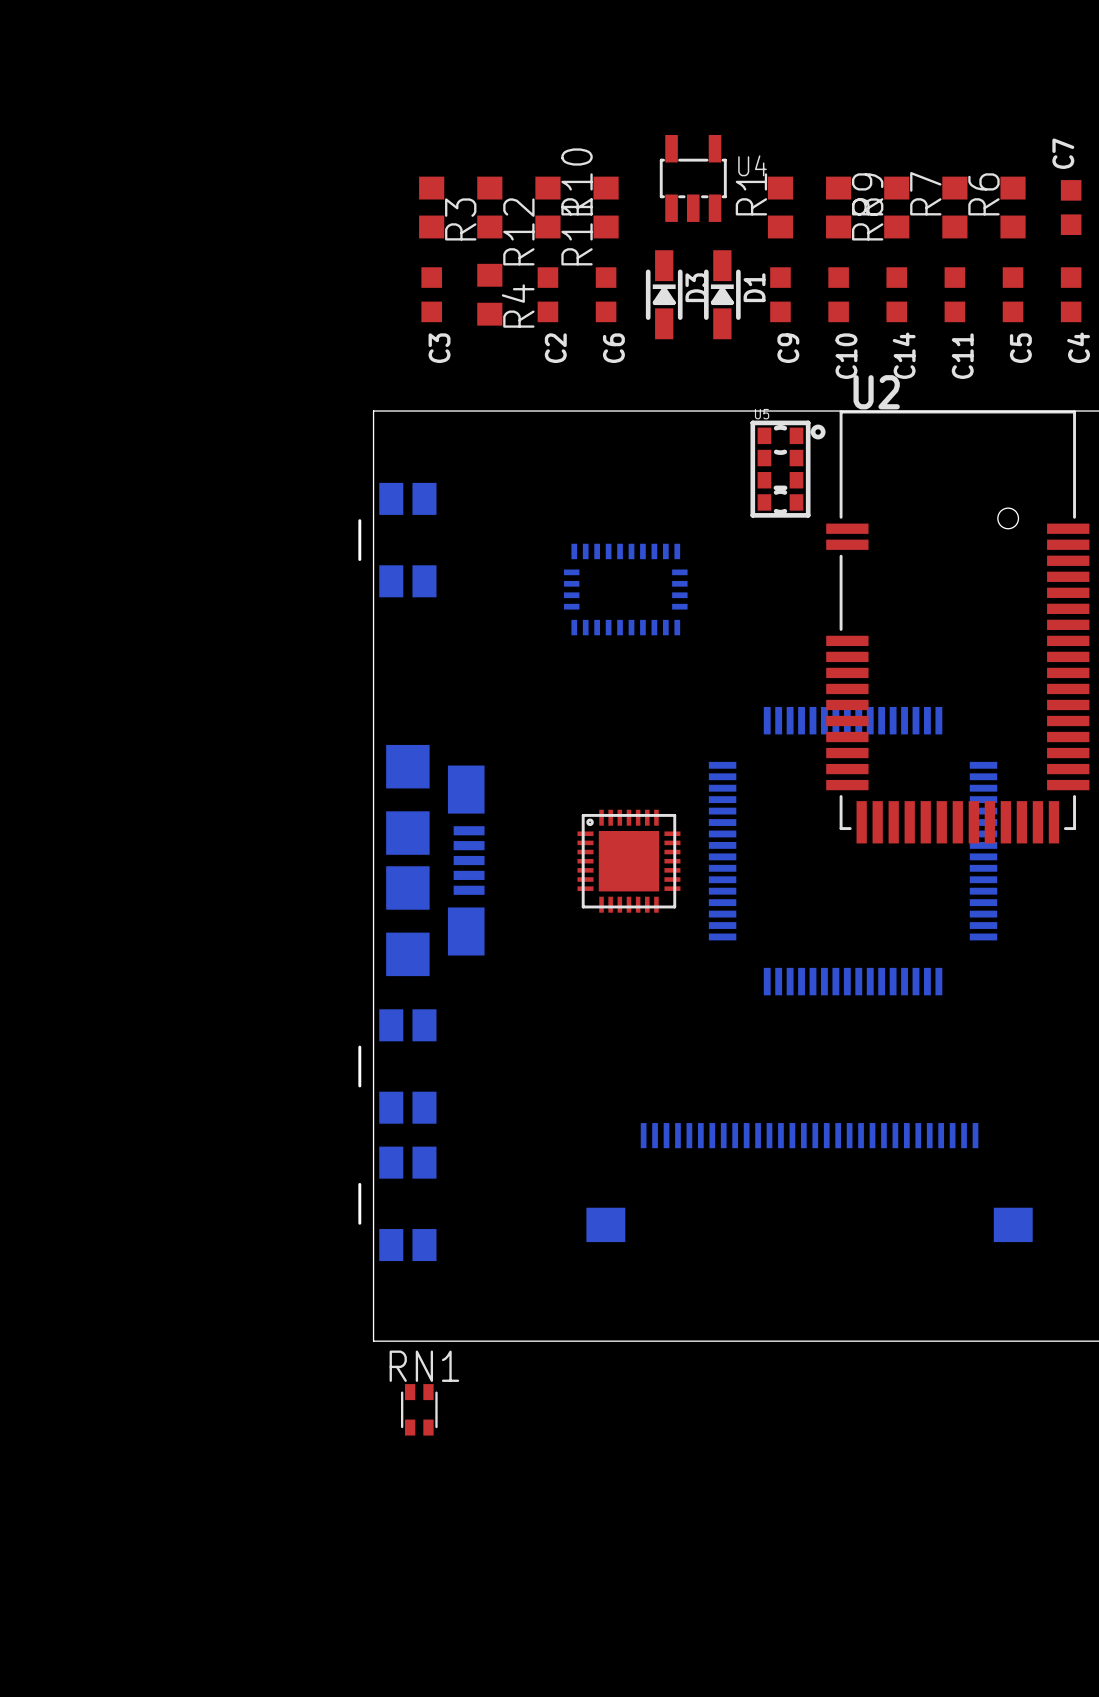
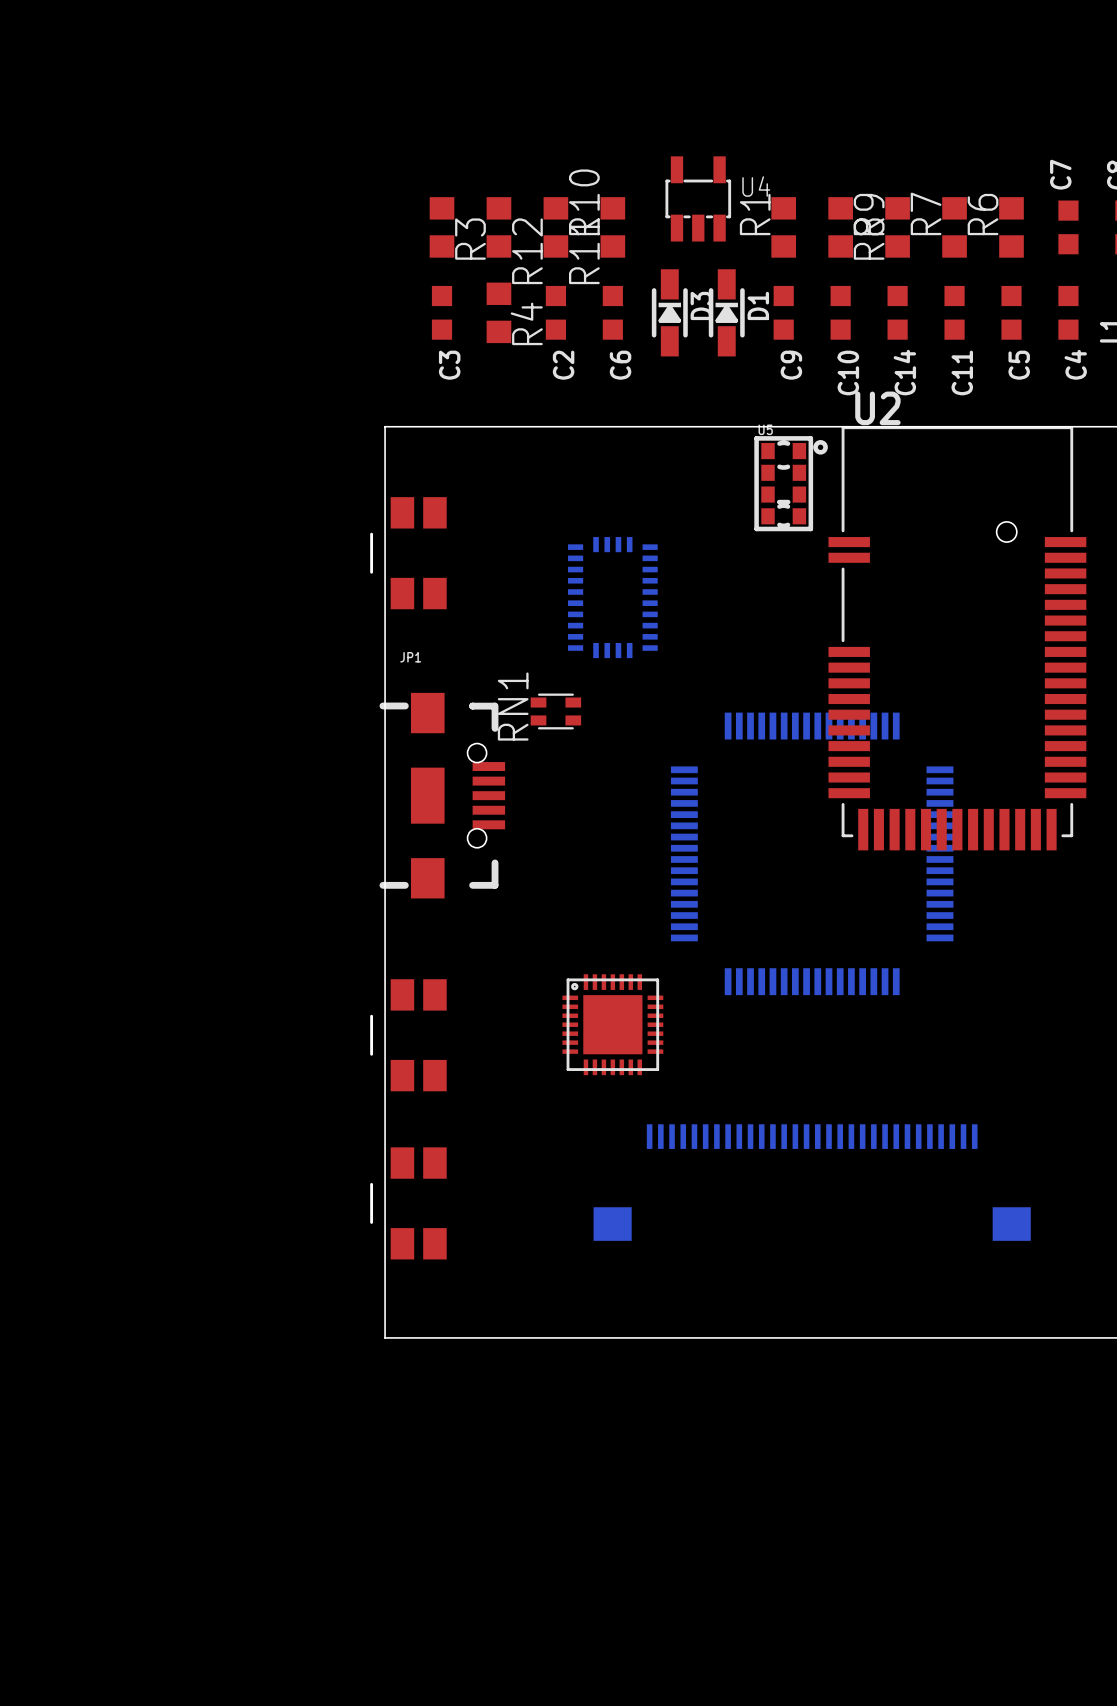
part side: bottom (397, 540) -> top (408, 553)
part rotation: 0° (625, 589) -> 90° clockwise (612, 597)
JP1: none -> (442, 795)
part position: (853, 851) -> (812, 853)
part: (435, 860) -> none
part position: (628, 861) -> (612, 1024)
part: none -> (408, 1035)
part: (397, 1066) -> none
part side: bottom (397, 1203) -> top (408, 1203)
RN1 name position: RN1 (424, 1366) -> RN1 (513, 706)
RN1 rotation: 0° (419, 1409) -> 90° clockwise (555, 711)
RN1 position: (419, 1409) -> (555, 711)

